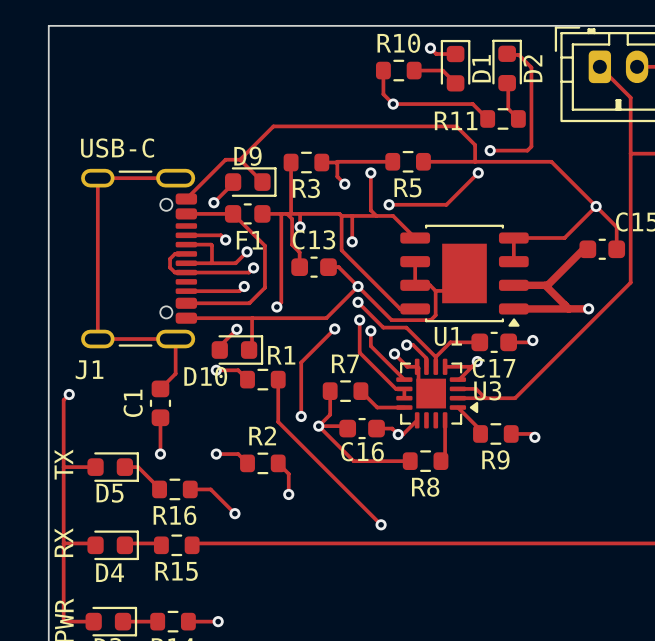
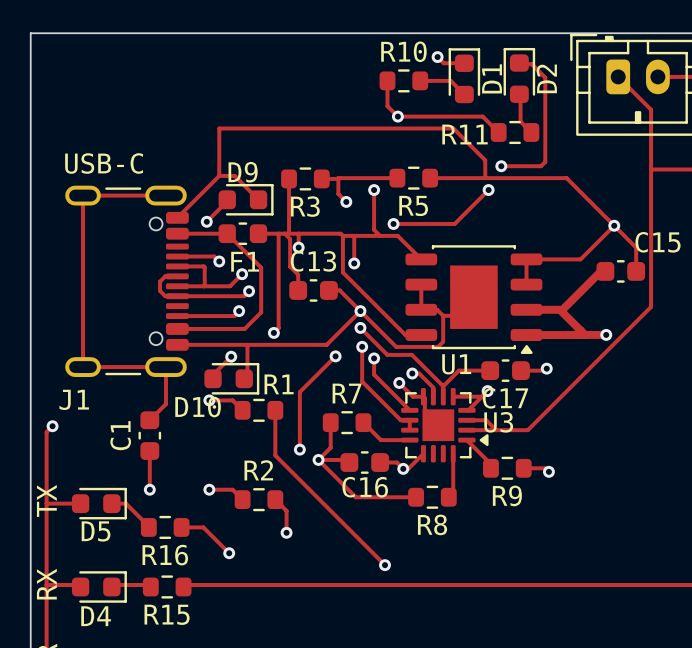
track: (456, 126) (273, 126) (240, 159) -> (465, 140) (453, 128) (219, 128) (219, 175)

